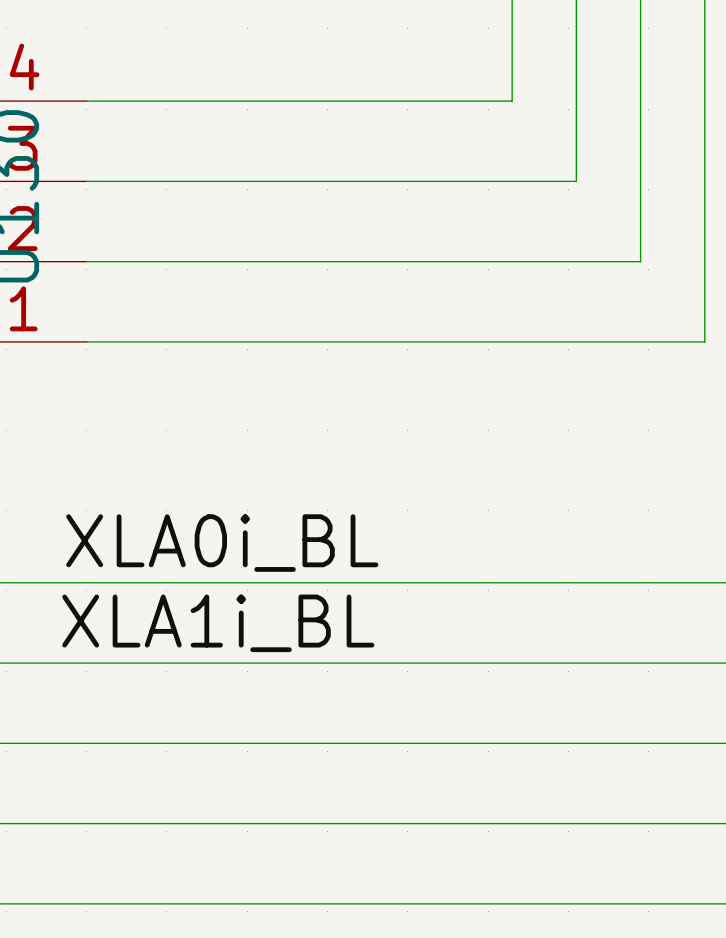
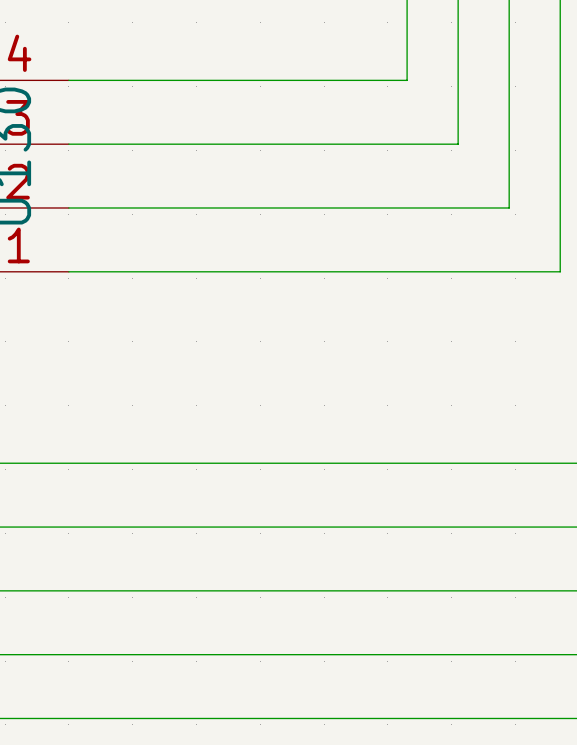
label: XLA0i_BL (222, 543) -> none
label: XLA1i_BL (218, 623) -> none

